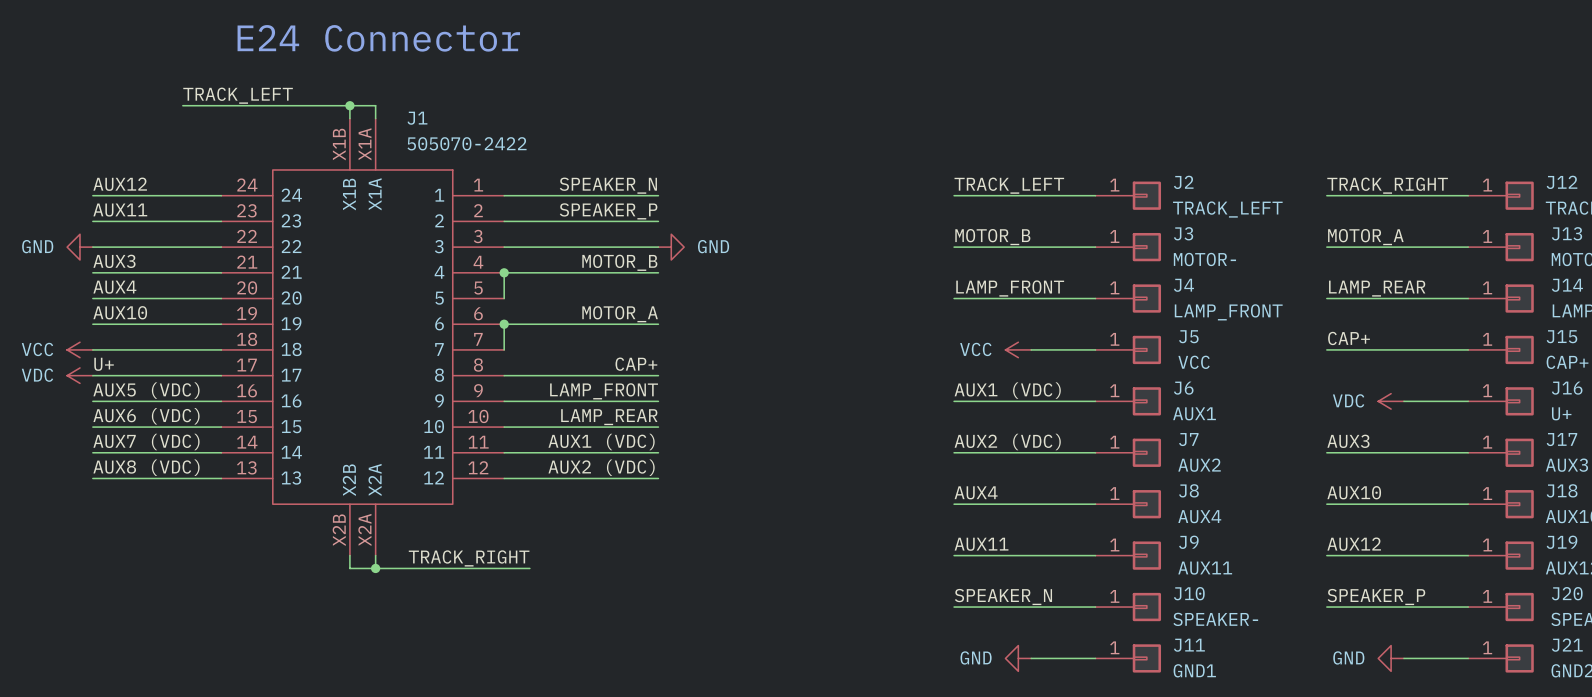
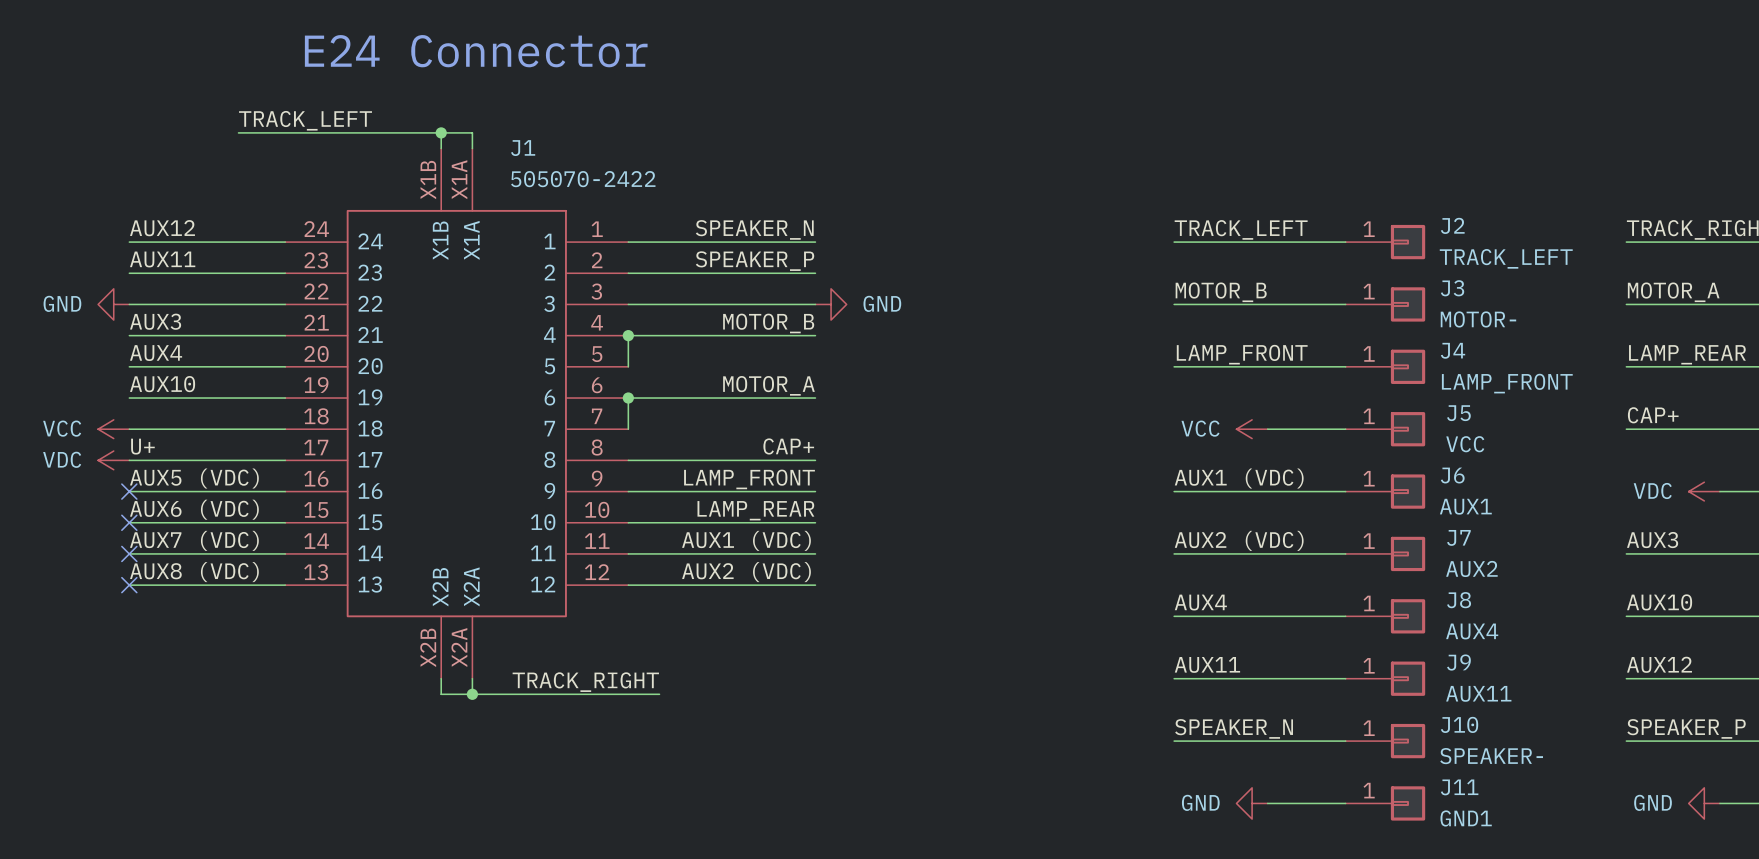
no-connect mark: none -> (129, 491)
no-connect mark: none -> (129, 522)
no-connect mark: none -> (129, 553)
no-connect mark: none -> (129, 585)

